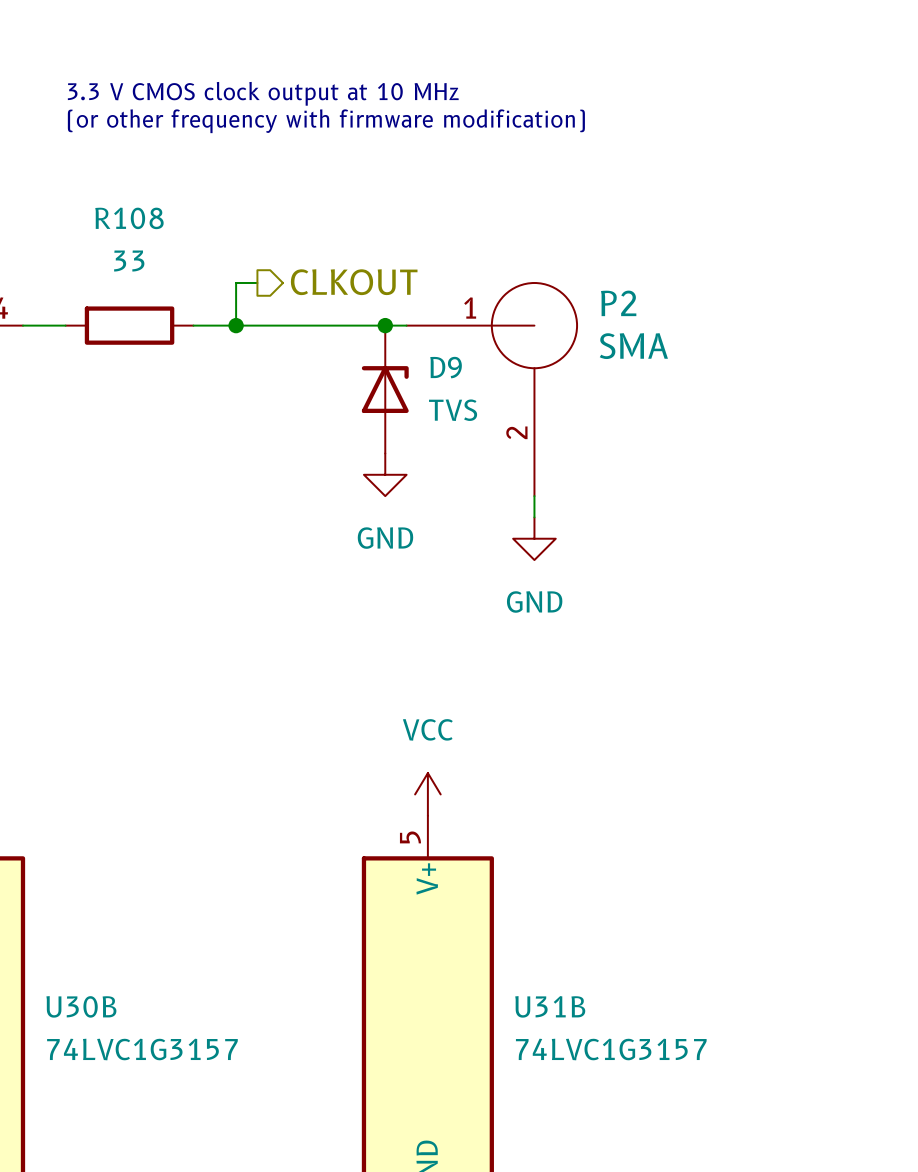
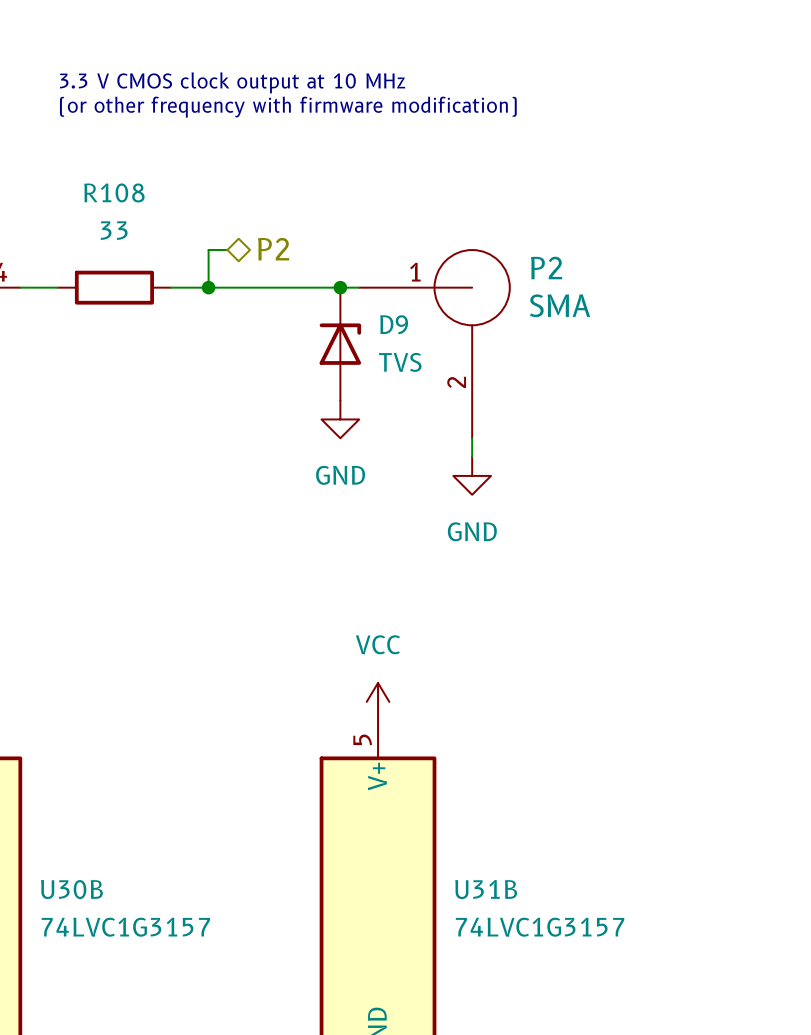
hierarchical label shape: output (354, 282) -> bidirectional (273, 249)
hierarchical label: CLKOUT (354, 282) -> P2 (273, 249)

